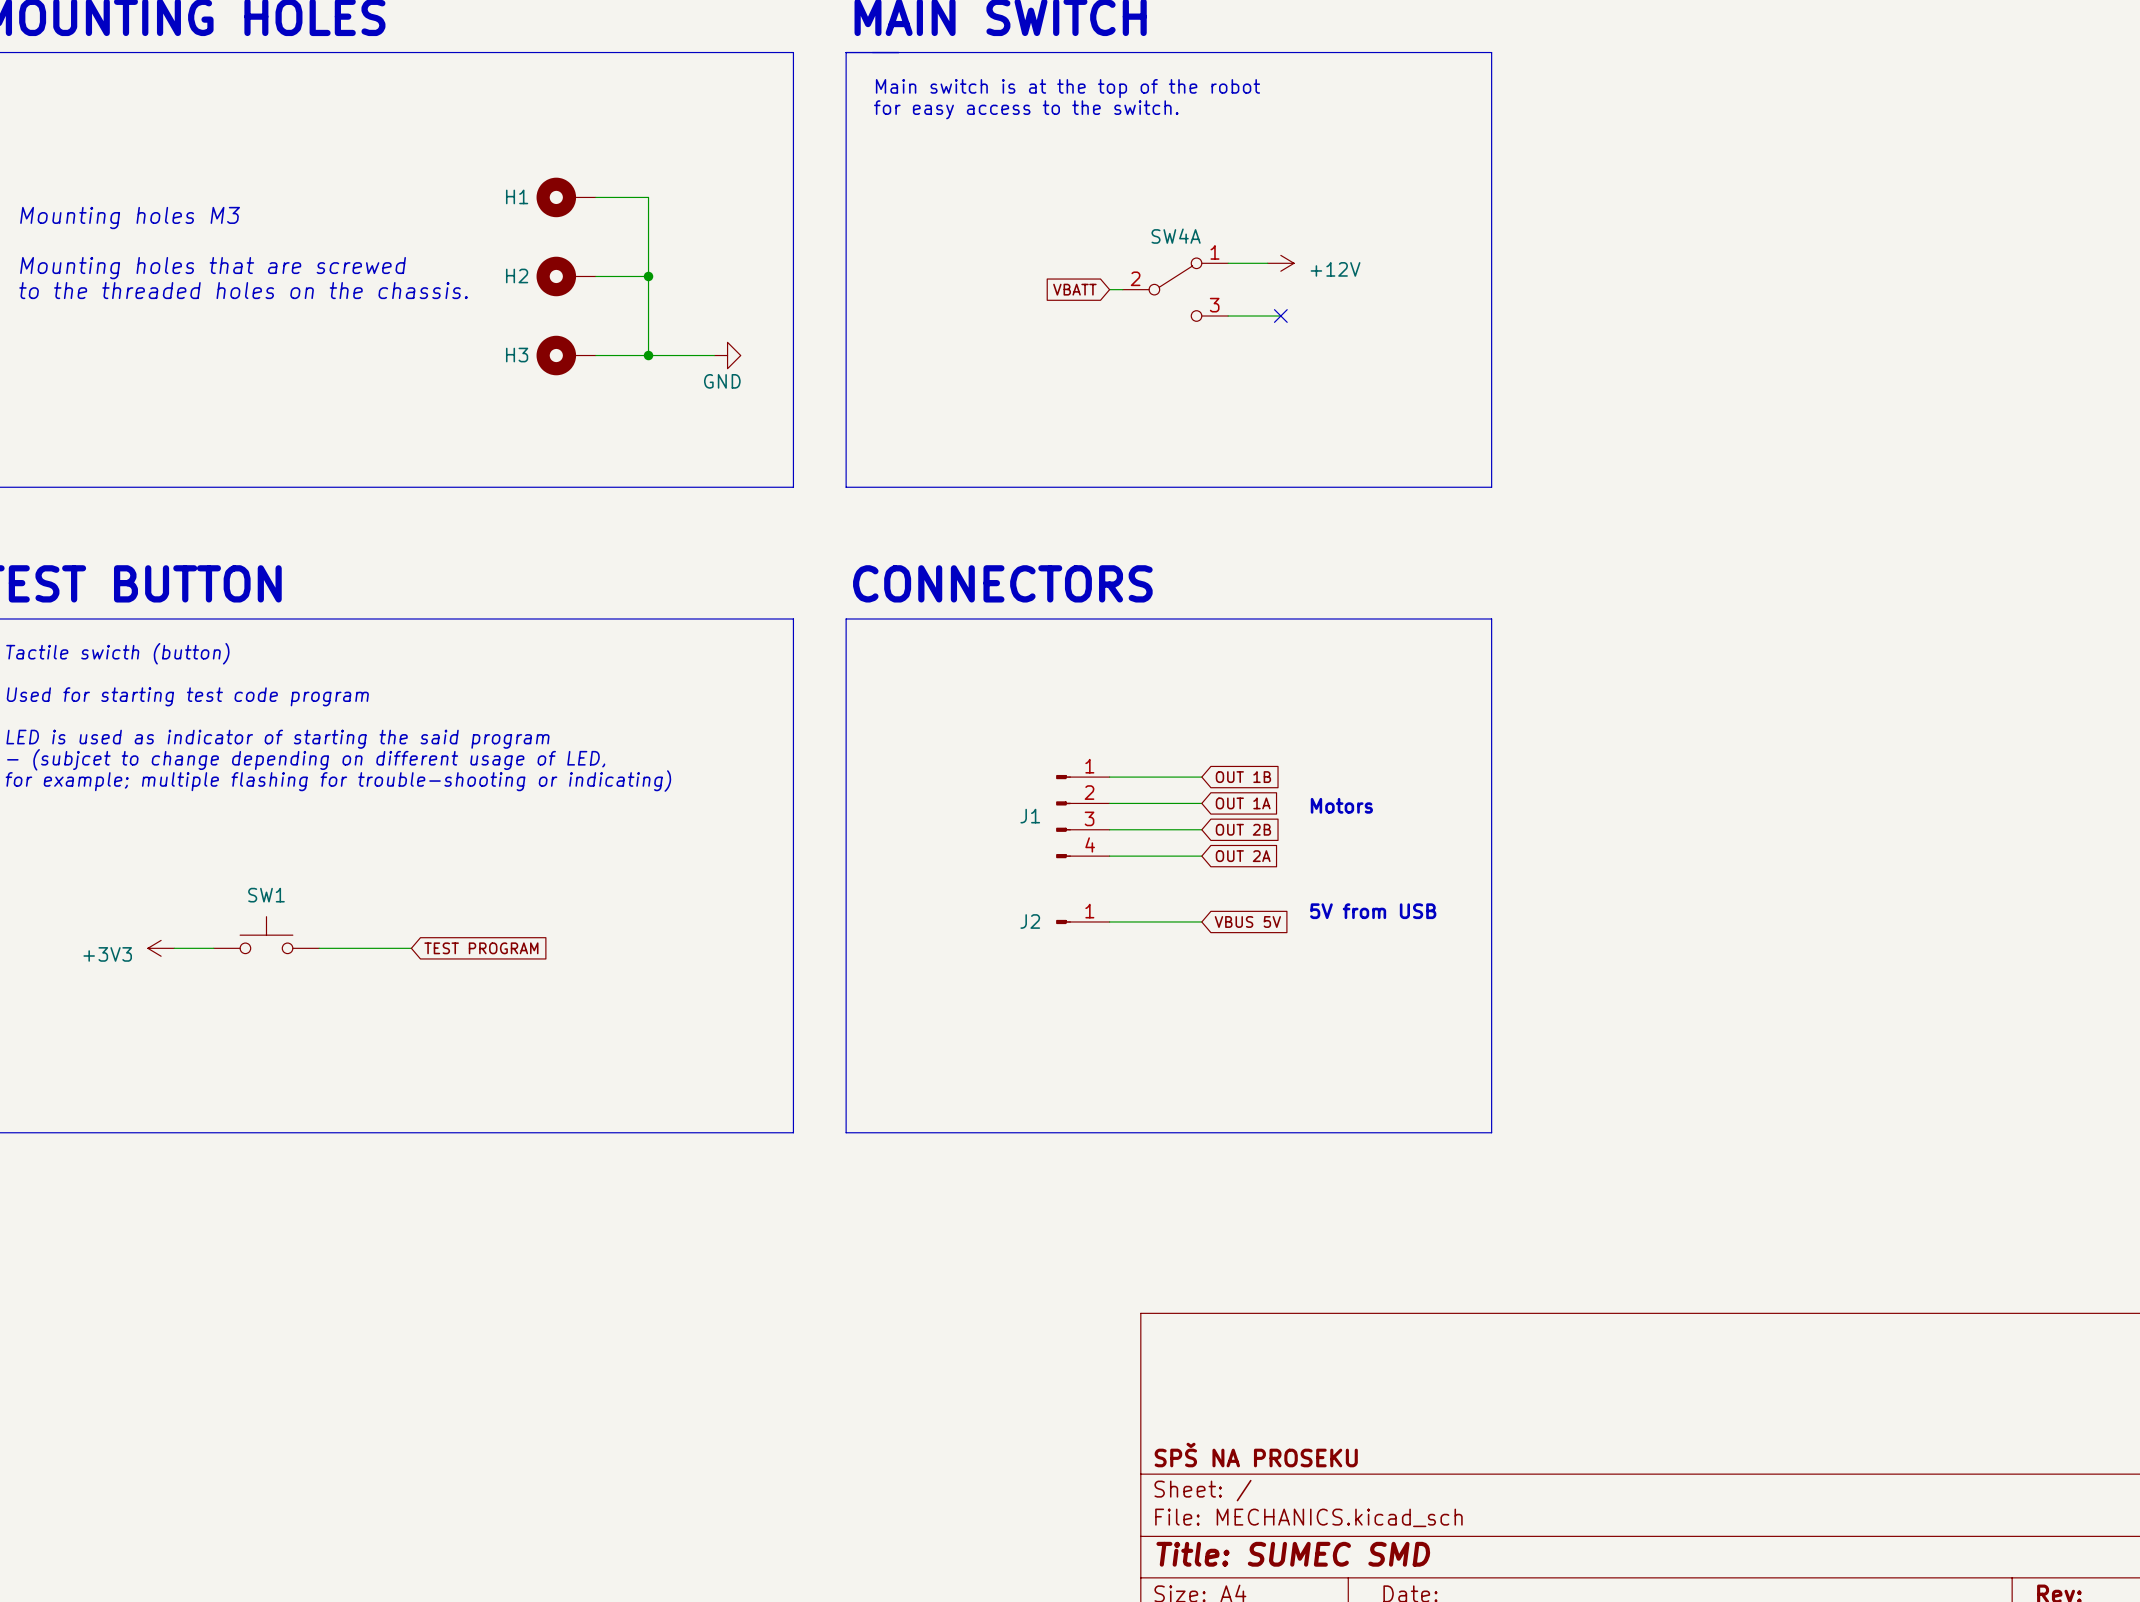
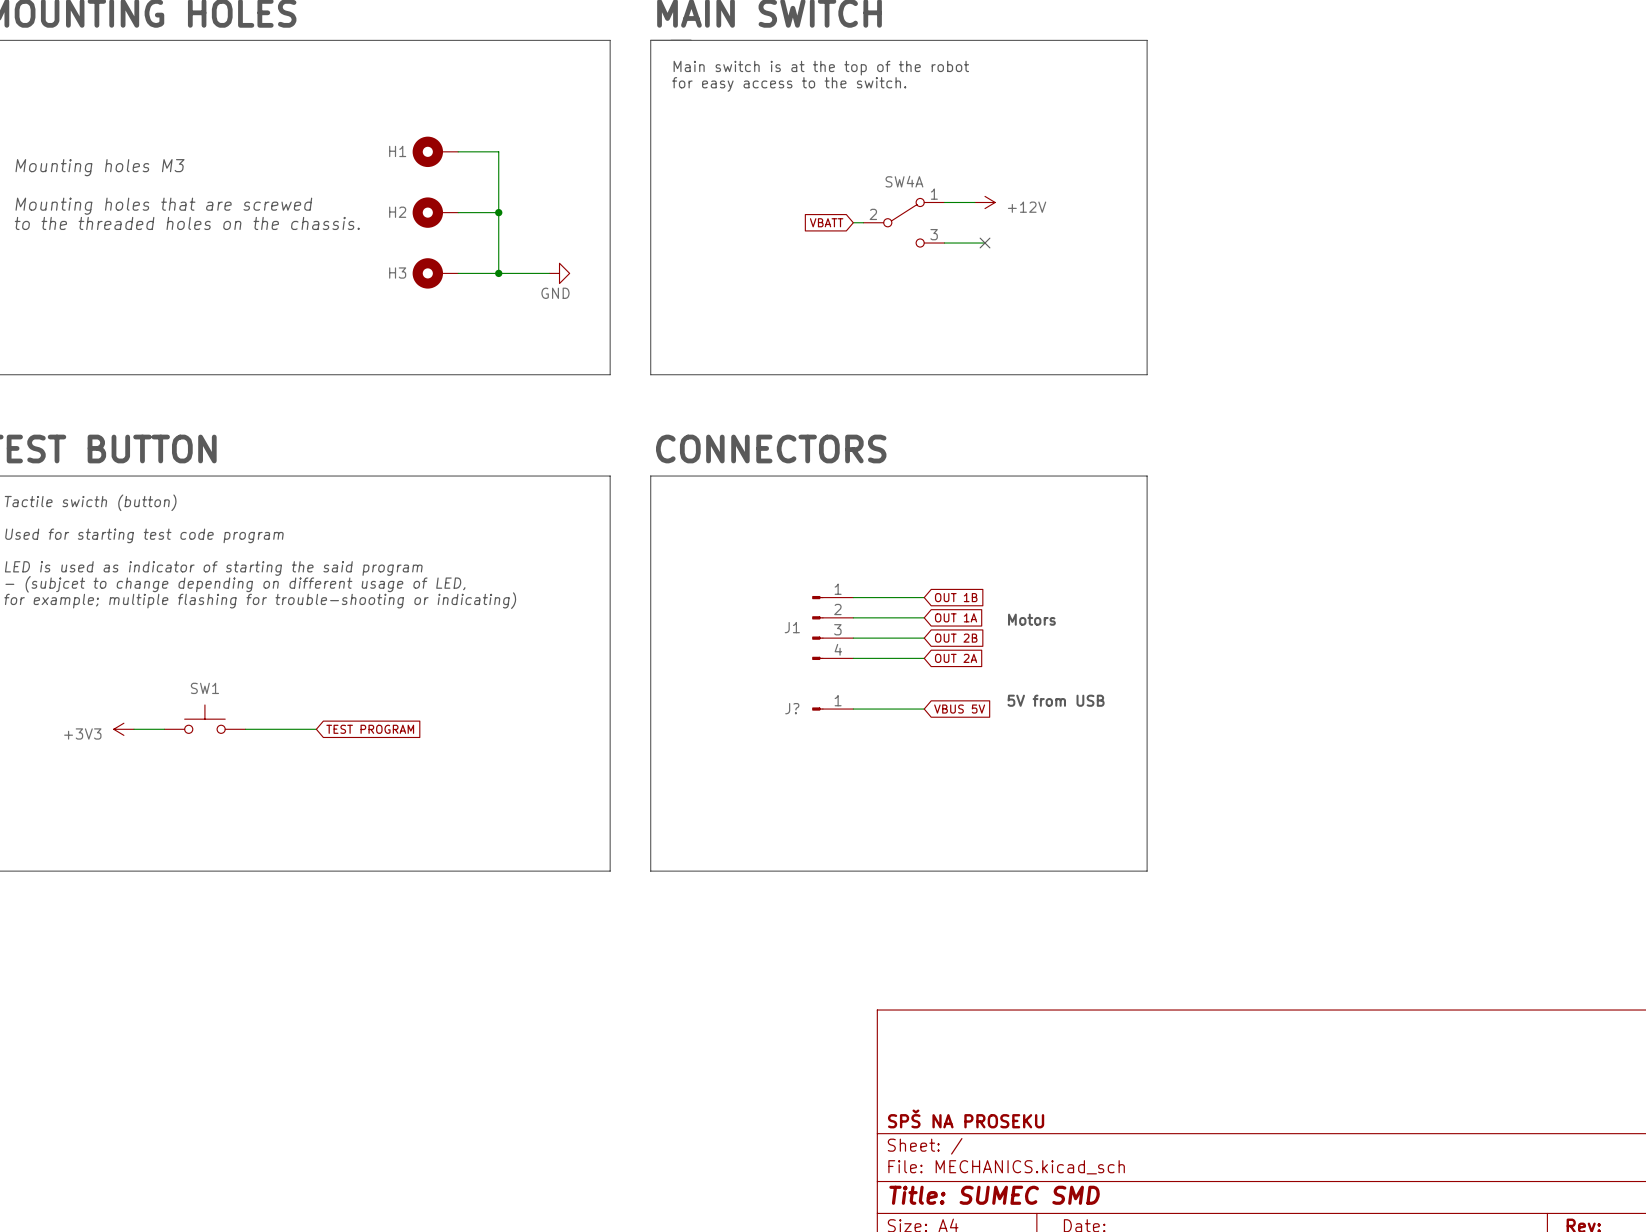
J2 name: J2 (1030, 921) -> J? (792, 708)

